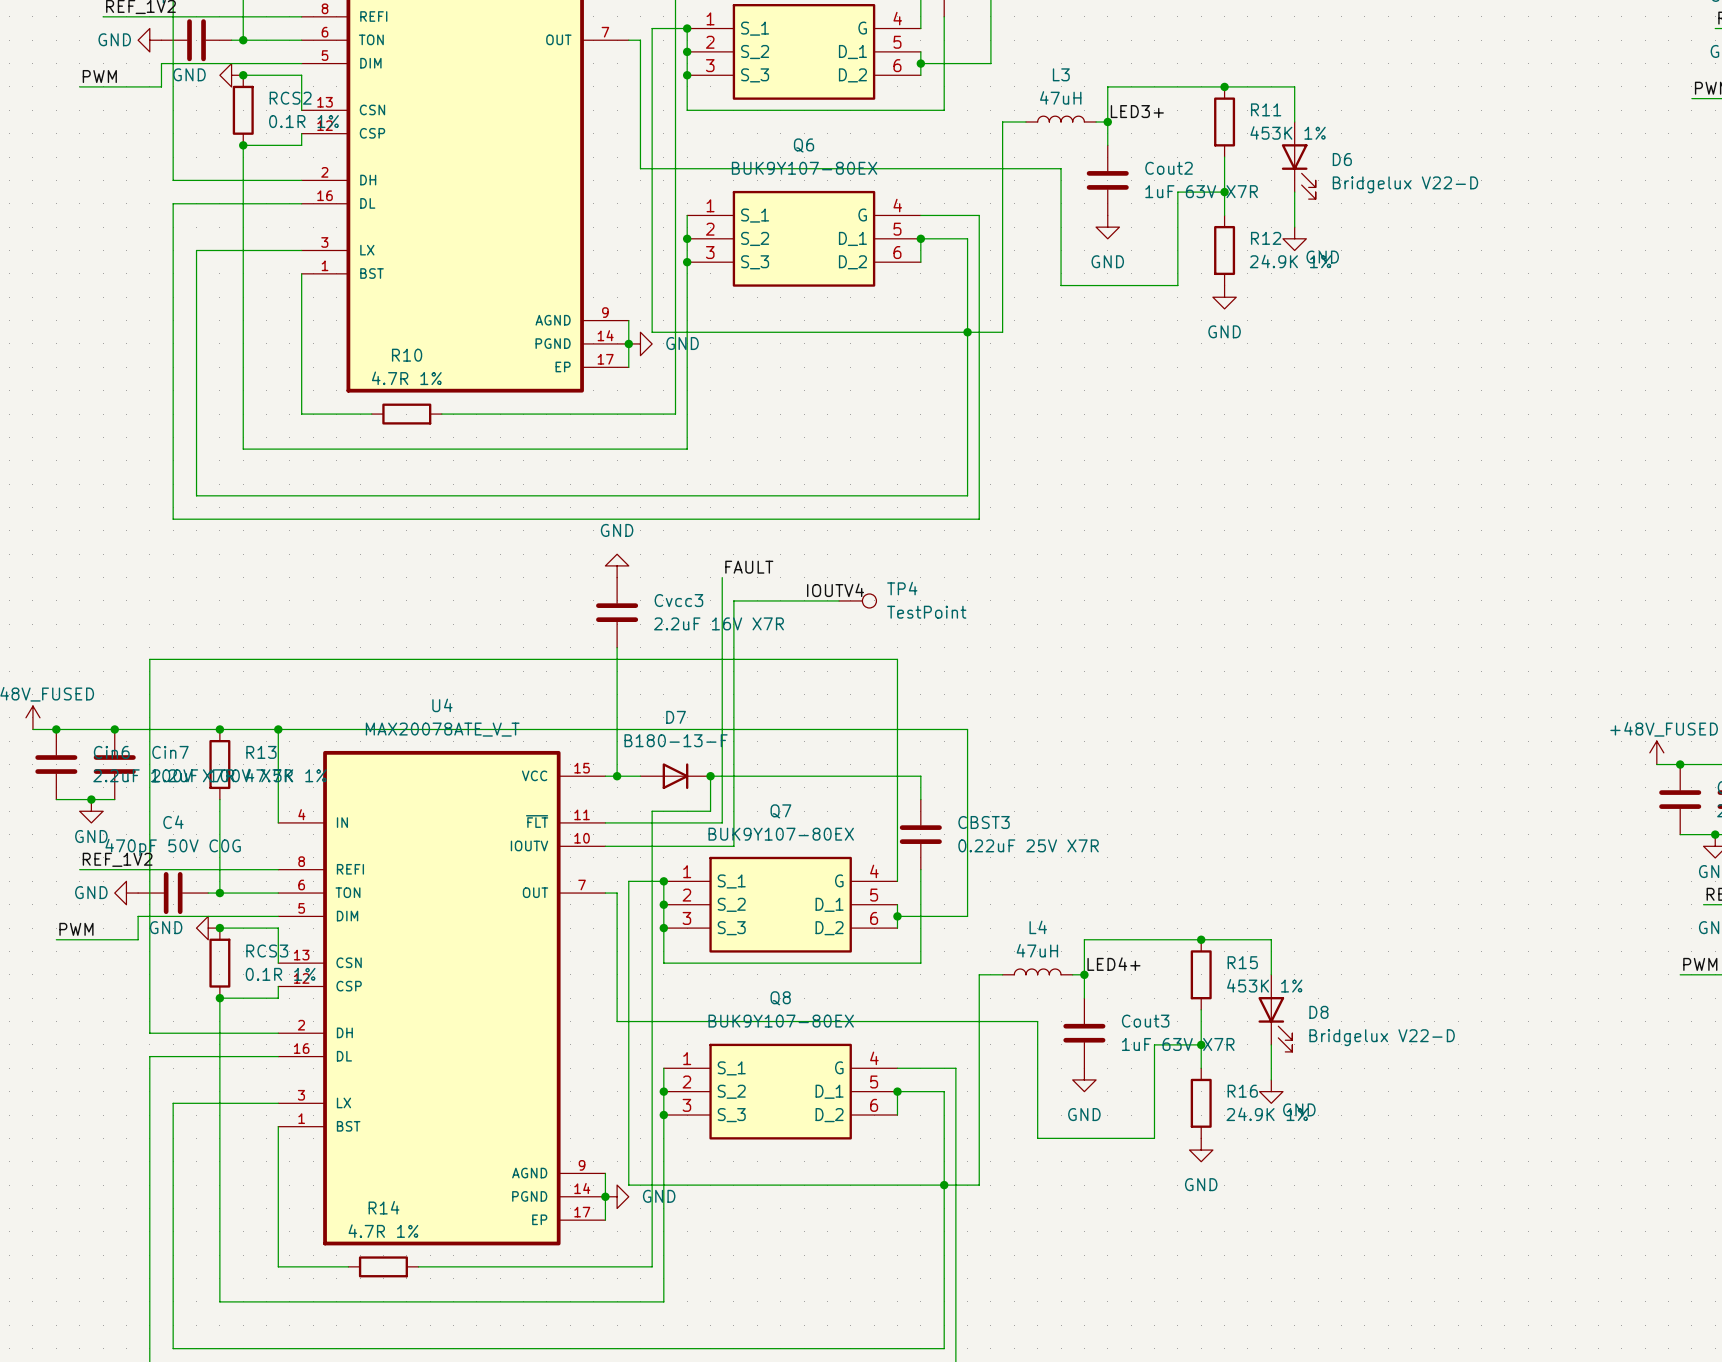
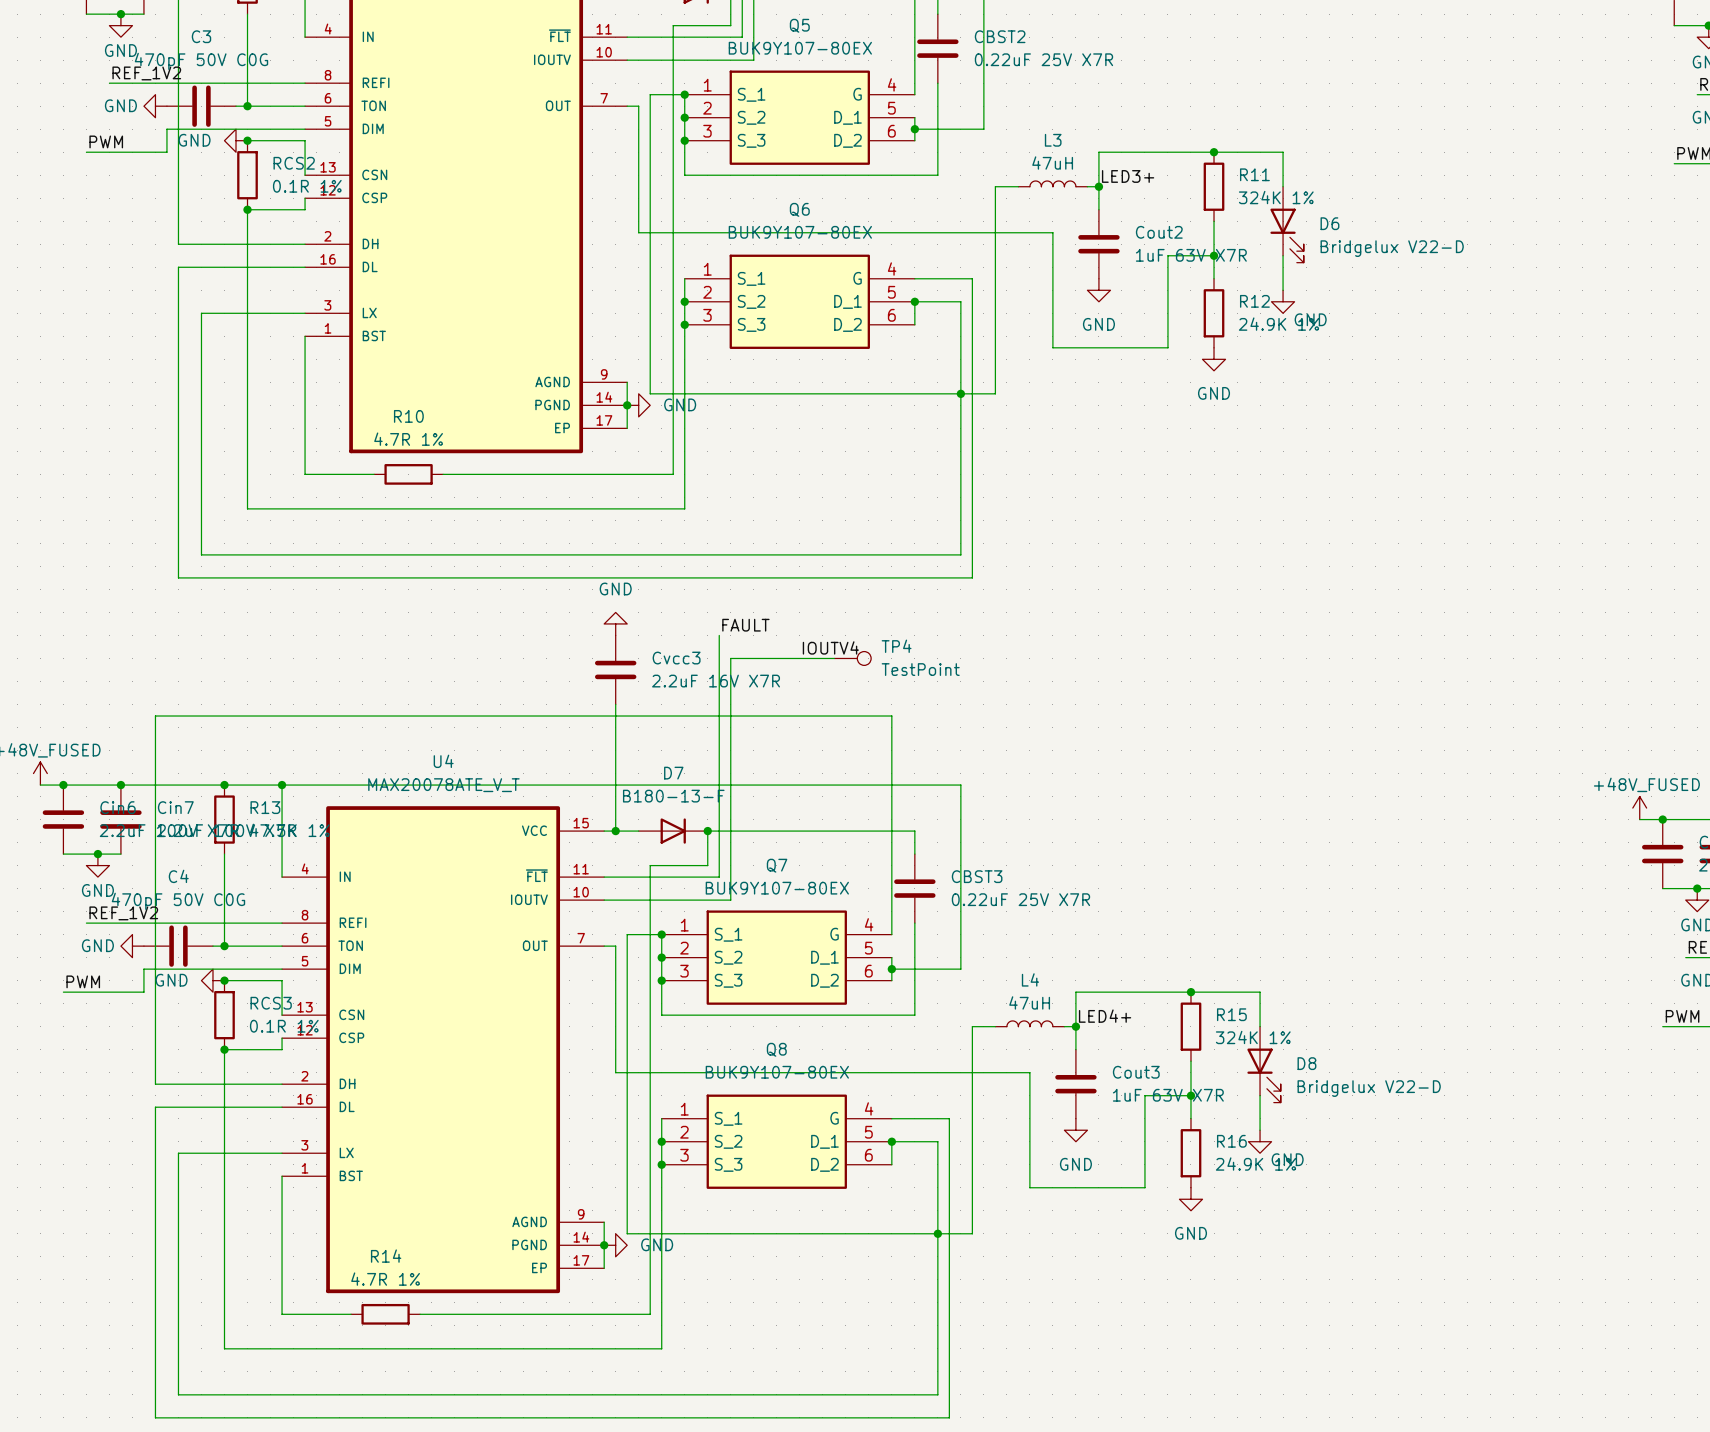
R11 value: 453K 1% (1288, 132) -> 324K 1% (1276, 197)
R15 value: 453K 1% (1264, 985) -> 324K 1% (1253, 1037)

